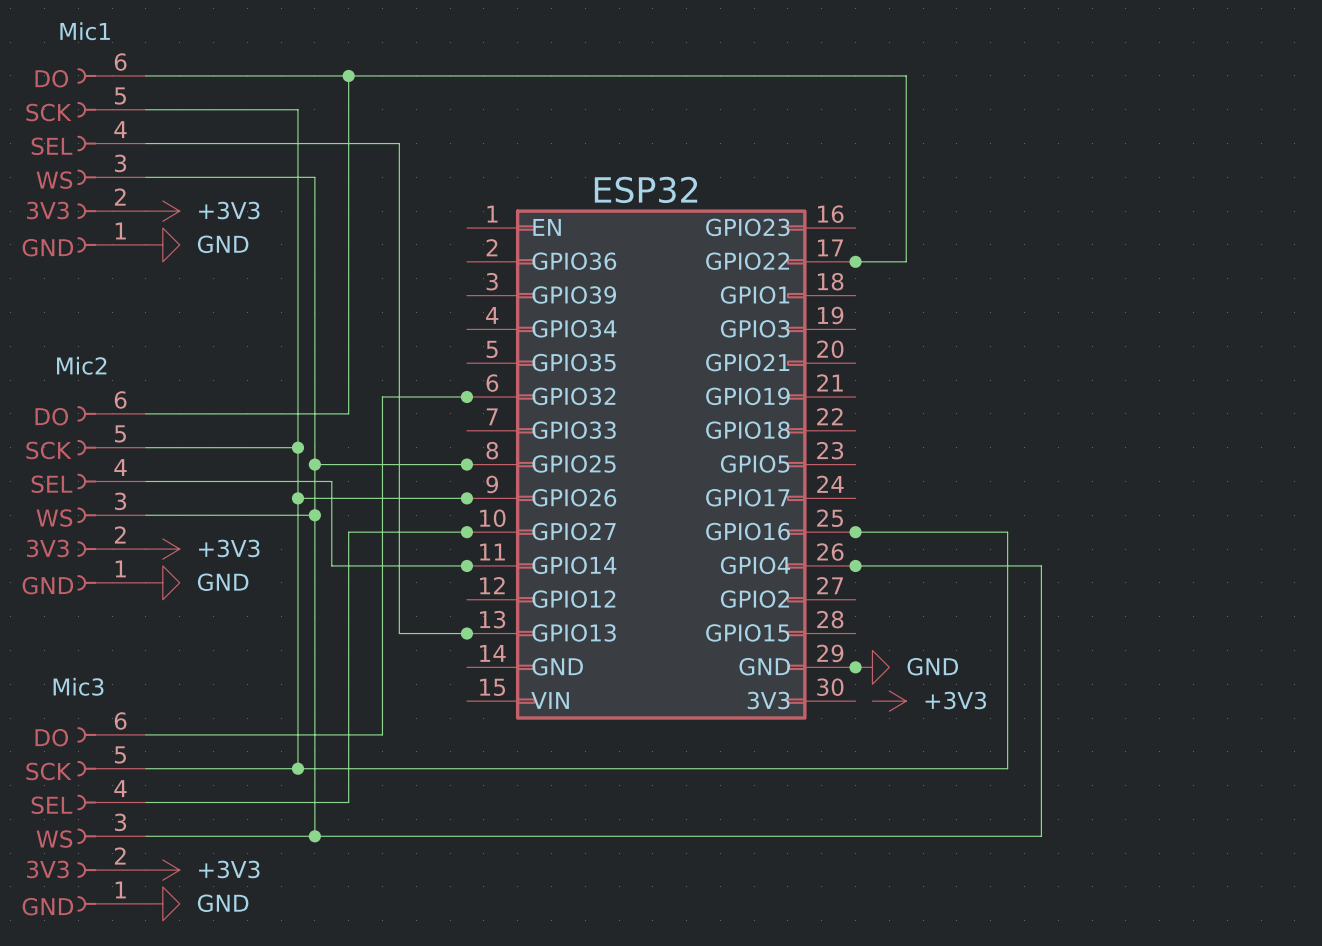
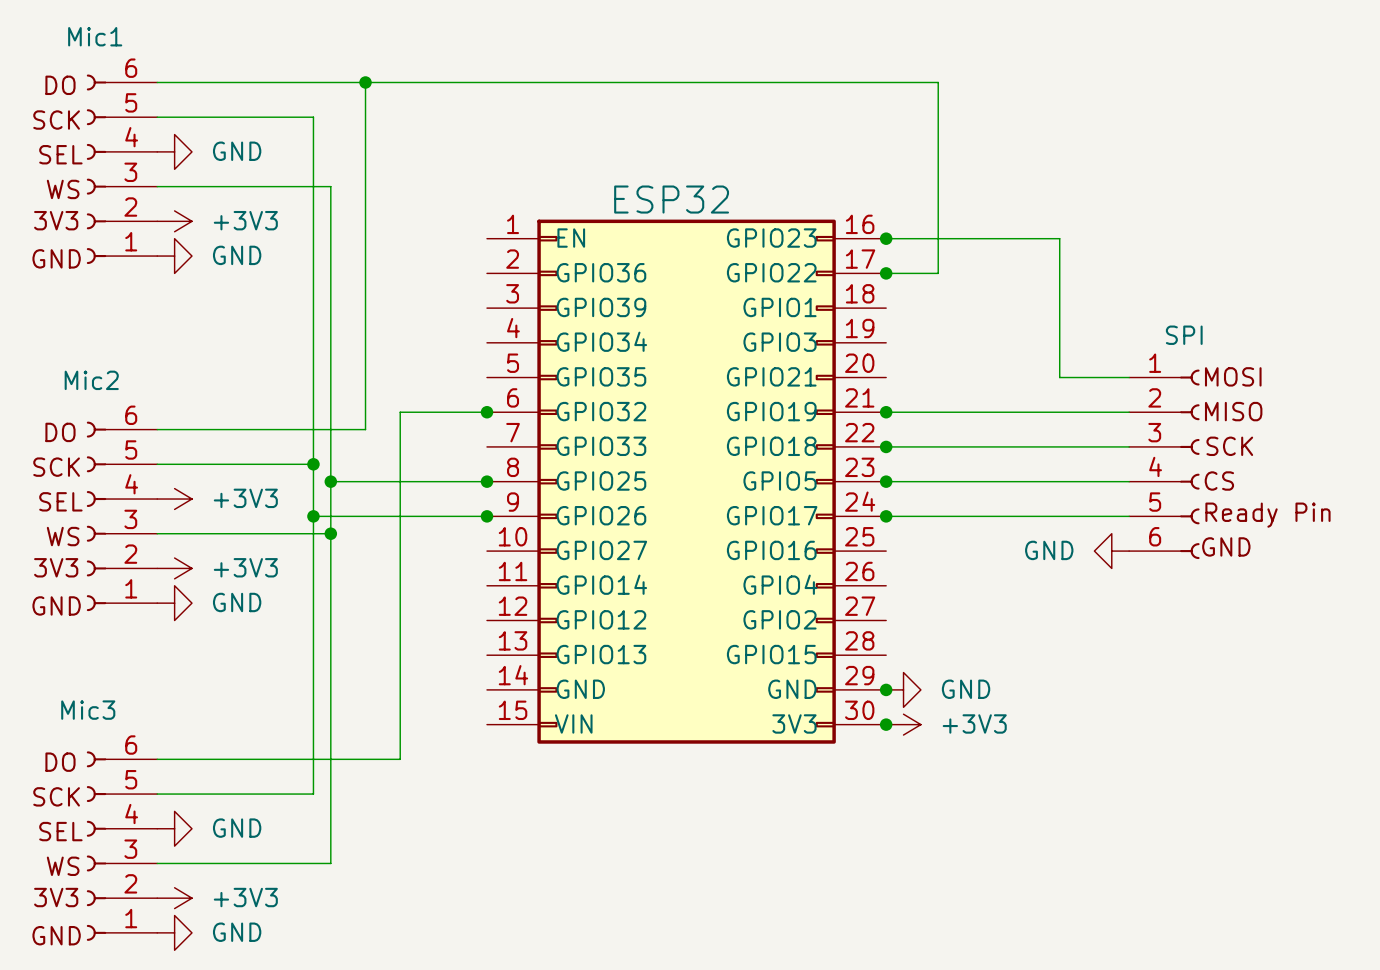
wire: (145, 143) (399, 143) (399, 633) (466, 633) -> none
power symbol: none -> GND (174, 151)
wire: none -> (886, 238) (1059, 238) (1059, 377) (1129, 377)
junction: none -> (886, 238)
wire: none -> (886, 412) (1129, 412)
junction: none -> (886, 412)
wire: none -> (886, 446) (1129, 446)
junction: none -> (886, 446)
SPI: none -> (1164, 464)
wire: none -> (886, 481) (1129, 481)
junction: none -> (886, 481)
wire: (145, 481) (331, 481) (331, 565) (466, 565) -> none
power symbol: none -> +3V3 (174, 499)
wire: none -> (886, 516) (1129, 516)
junction: none -> (886, 516)
wire: (466, 532) (348, 532) (348, 802) (145, 802) -> none
junction: (466, 532) -> none
wire: (855, 532) (1007, 532) (1007, 768) (297, 768) -> none
junction: (855, 532) -> none
power symbol: none -> GND (1111, 551)
junction: (466, 565) -> none
wire: (855, 565) (1041, 565) (1041, 836) (314, 836) -> none
junction: (855, 565) -> none
junction: (466, 633) -> none
junction: none -> (886, 724)
power symbol position: +3V3 (889, 701) -> +3V3 (903, 724)
junction: (297, 768) -> none
power symbol: none -> GND (174, 828)
junction: (314, 836) -> none

